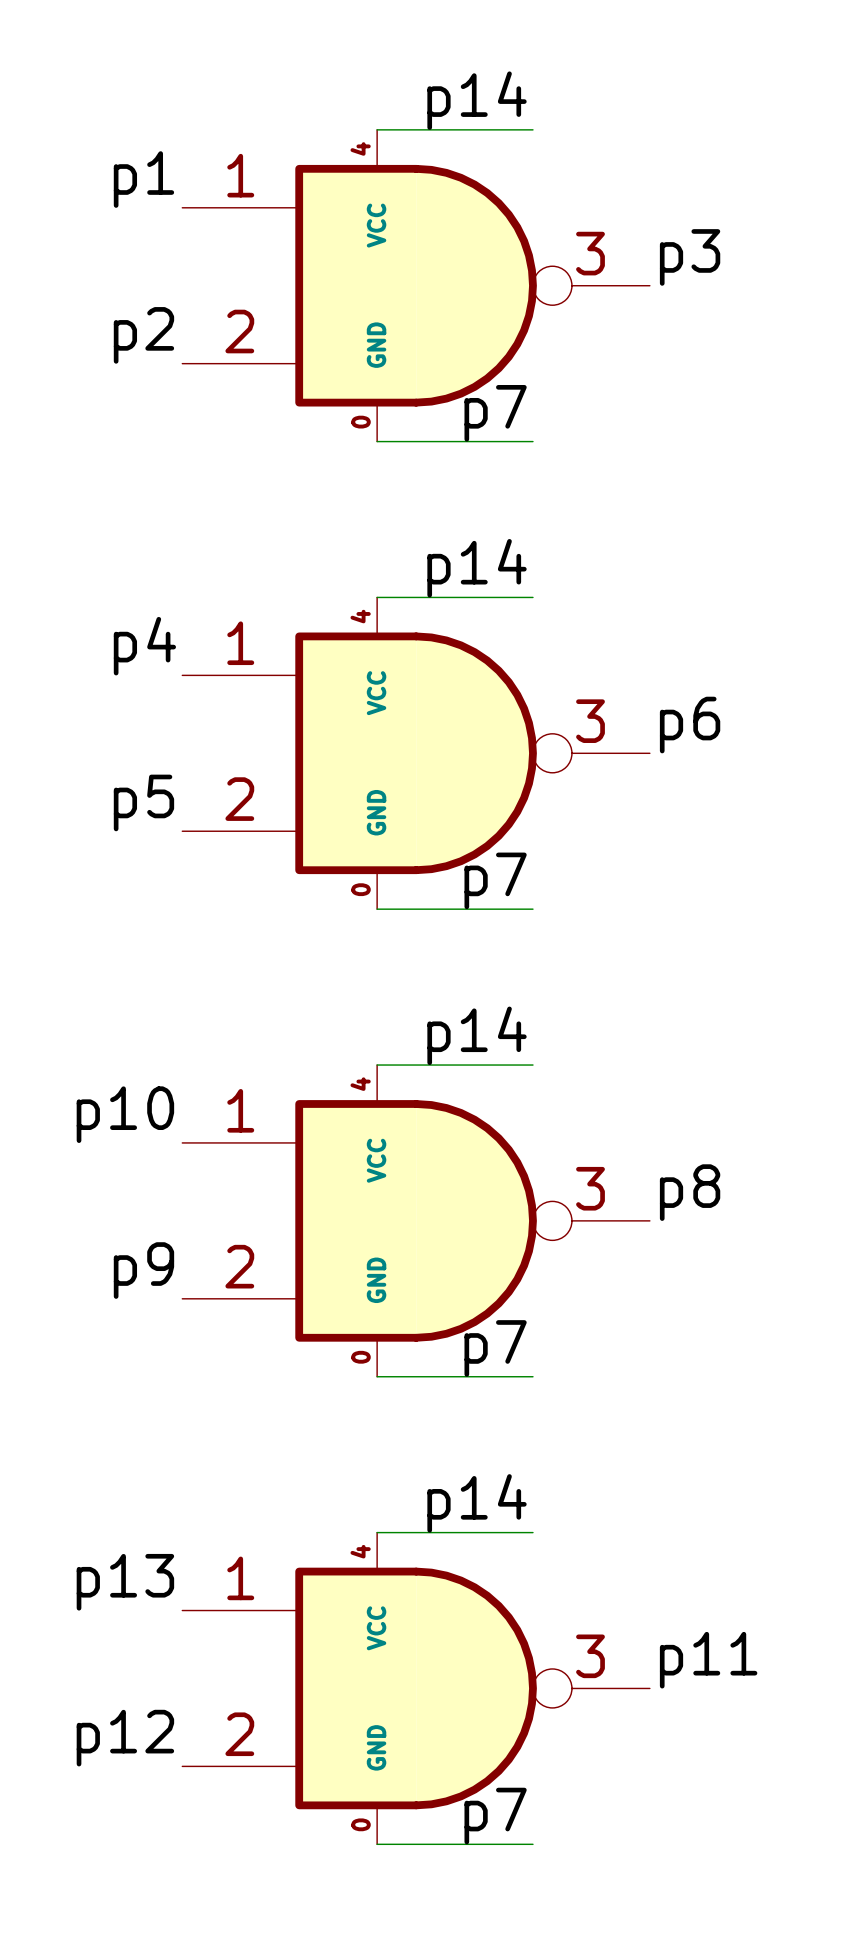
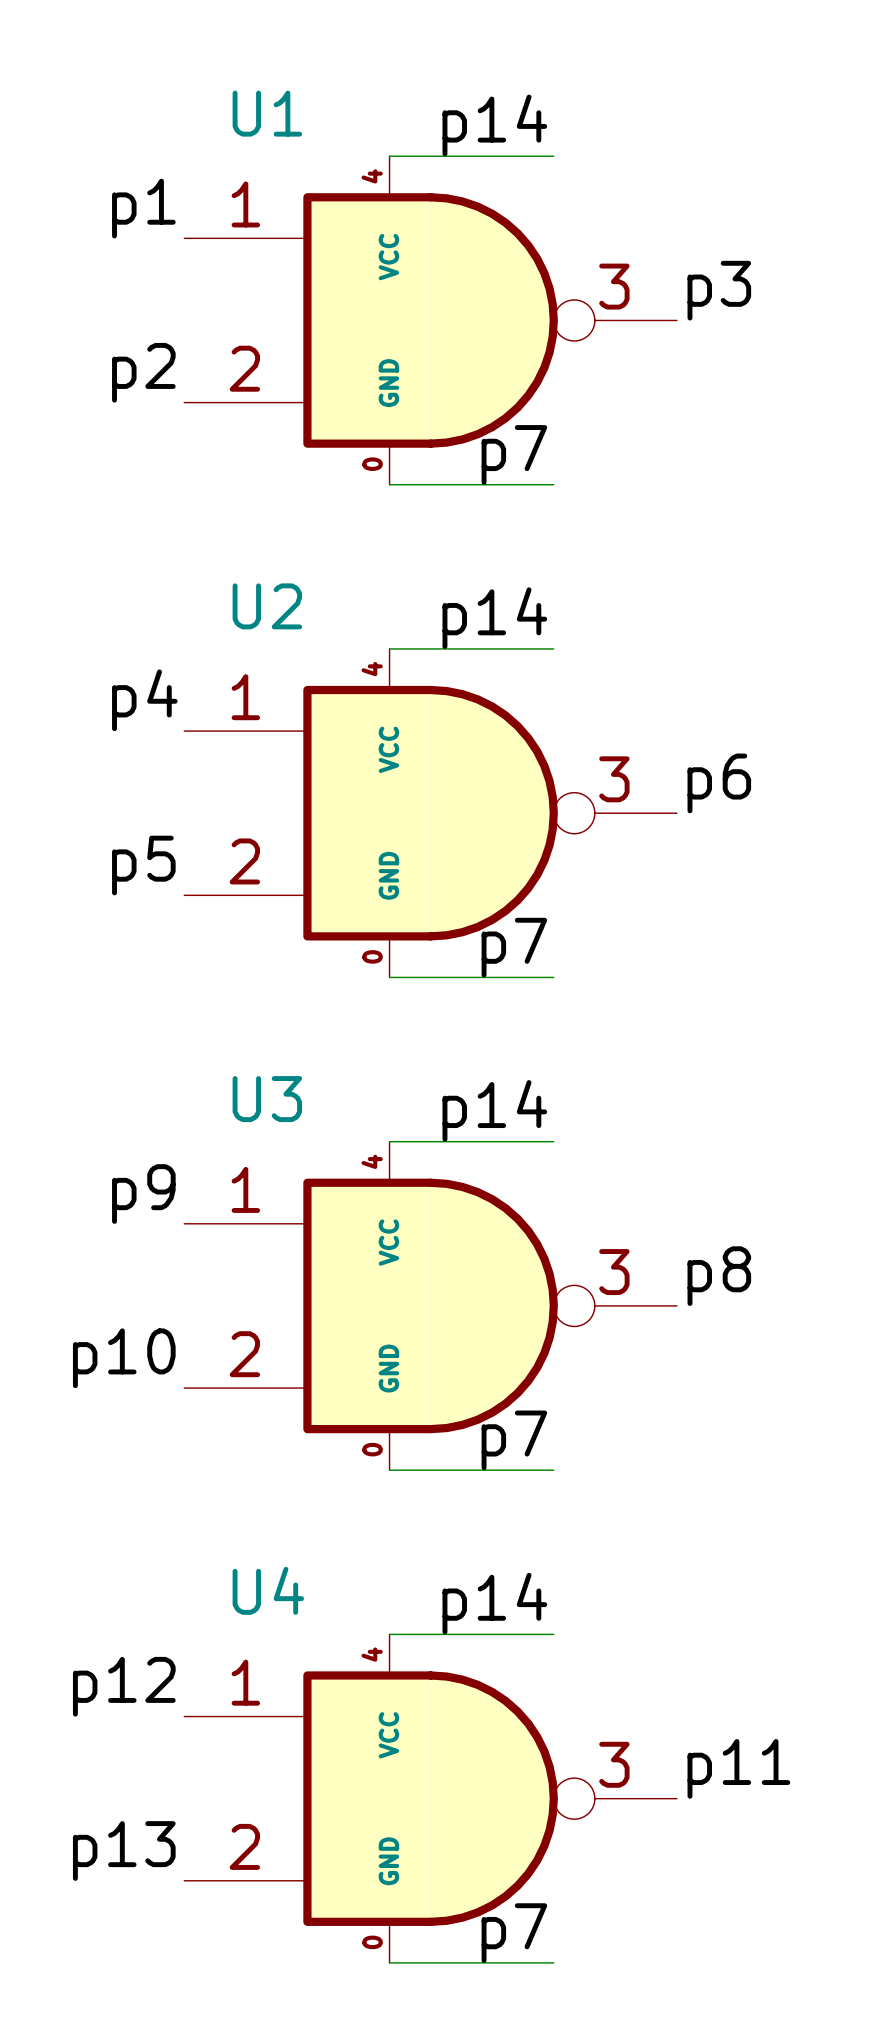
U1 name: none -> U1 (267, 113)
U2 name: none -> U2 (267, 606)
U3 name: none -> U3 (267, 1099)
label: p10 (125, 1114) -> p9 (143, 1194)
label: p9 (143, 1270) -> p10 (124, 1358)
U4 name: none -> U4 (268, 1590)
label: p13 (125, 1582) -> p12 (124, 1686)
label: p12 (125, 1738) -> p13 (124, 1850)

